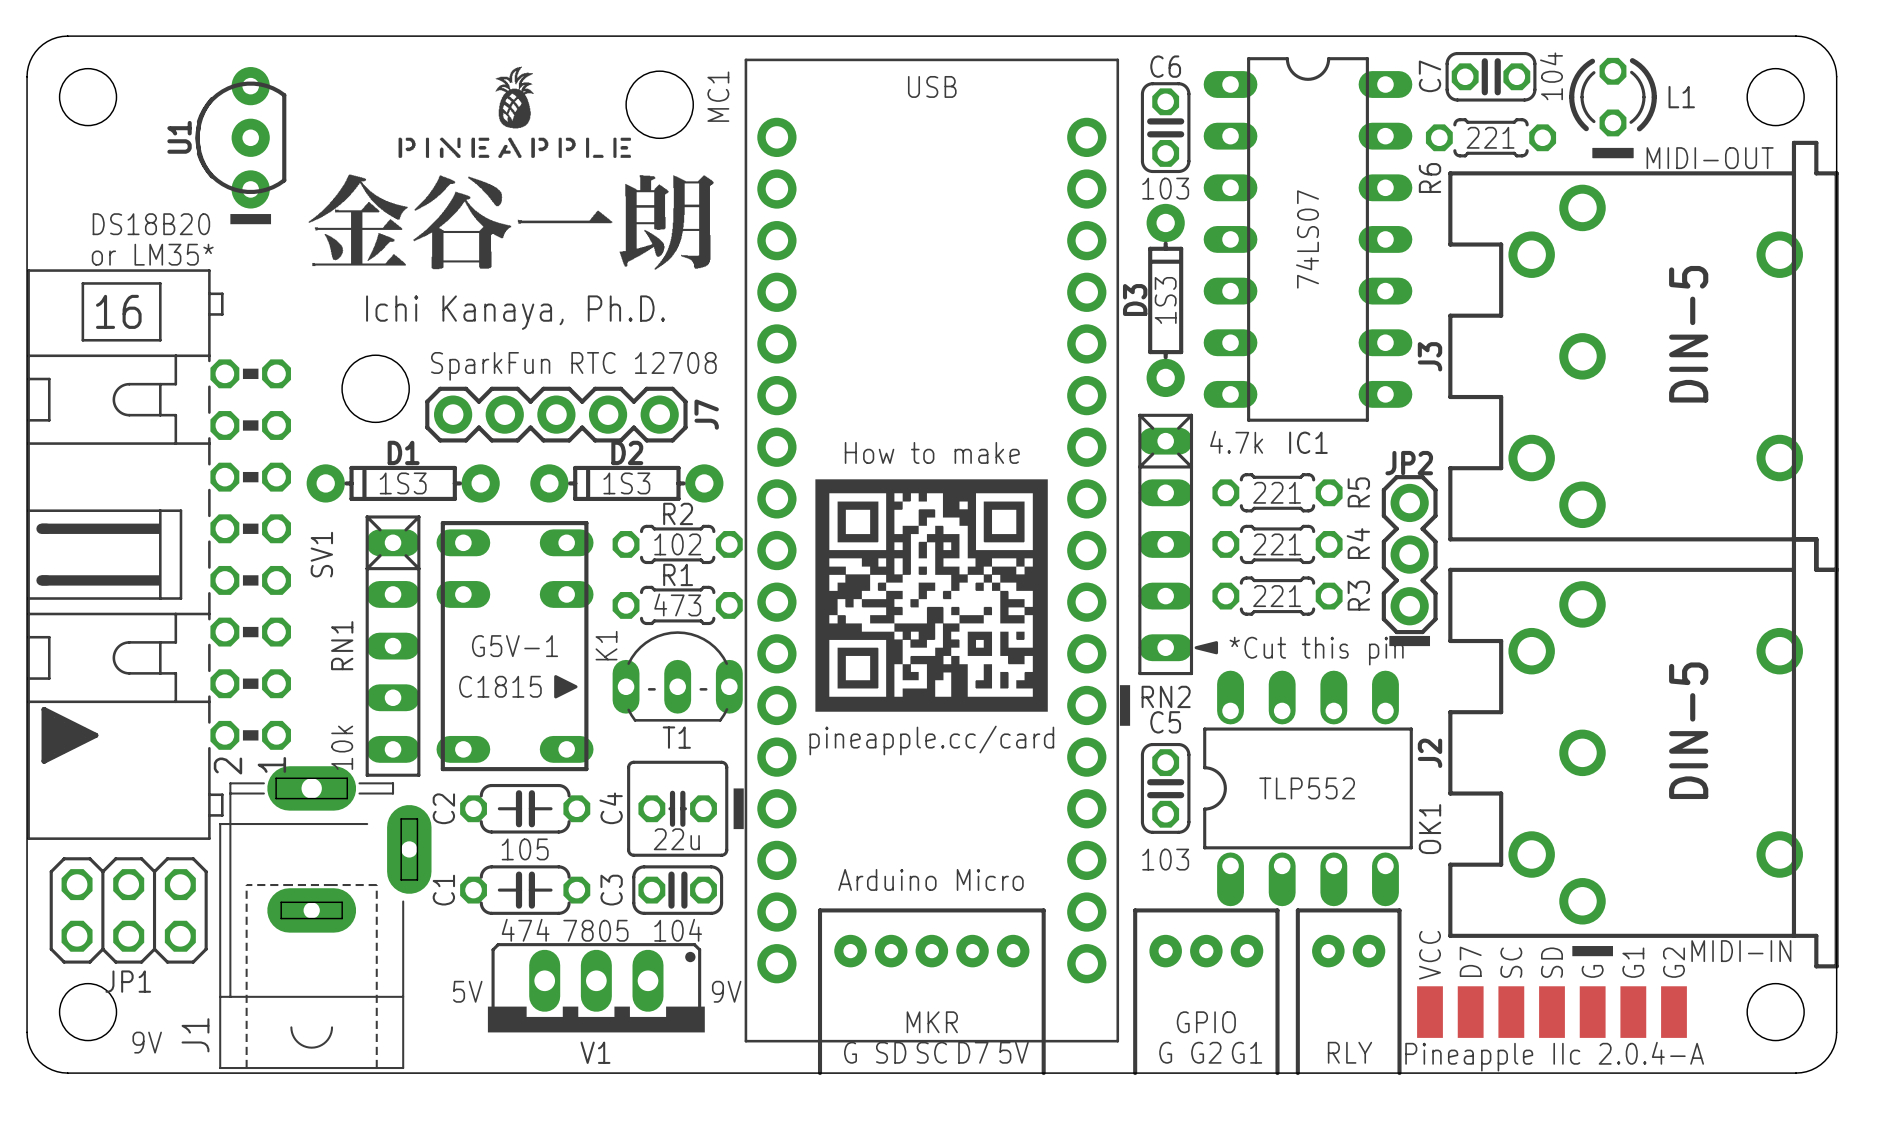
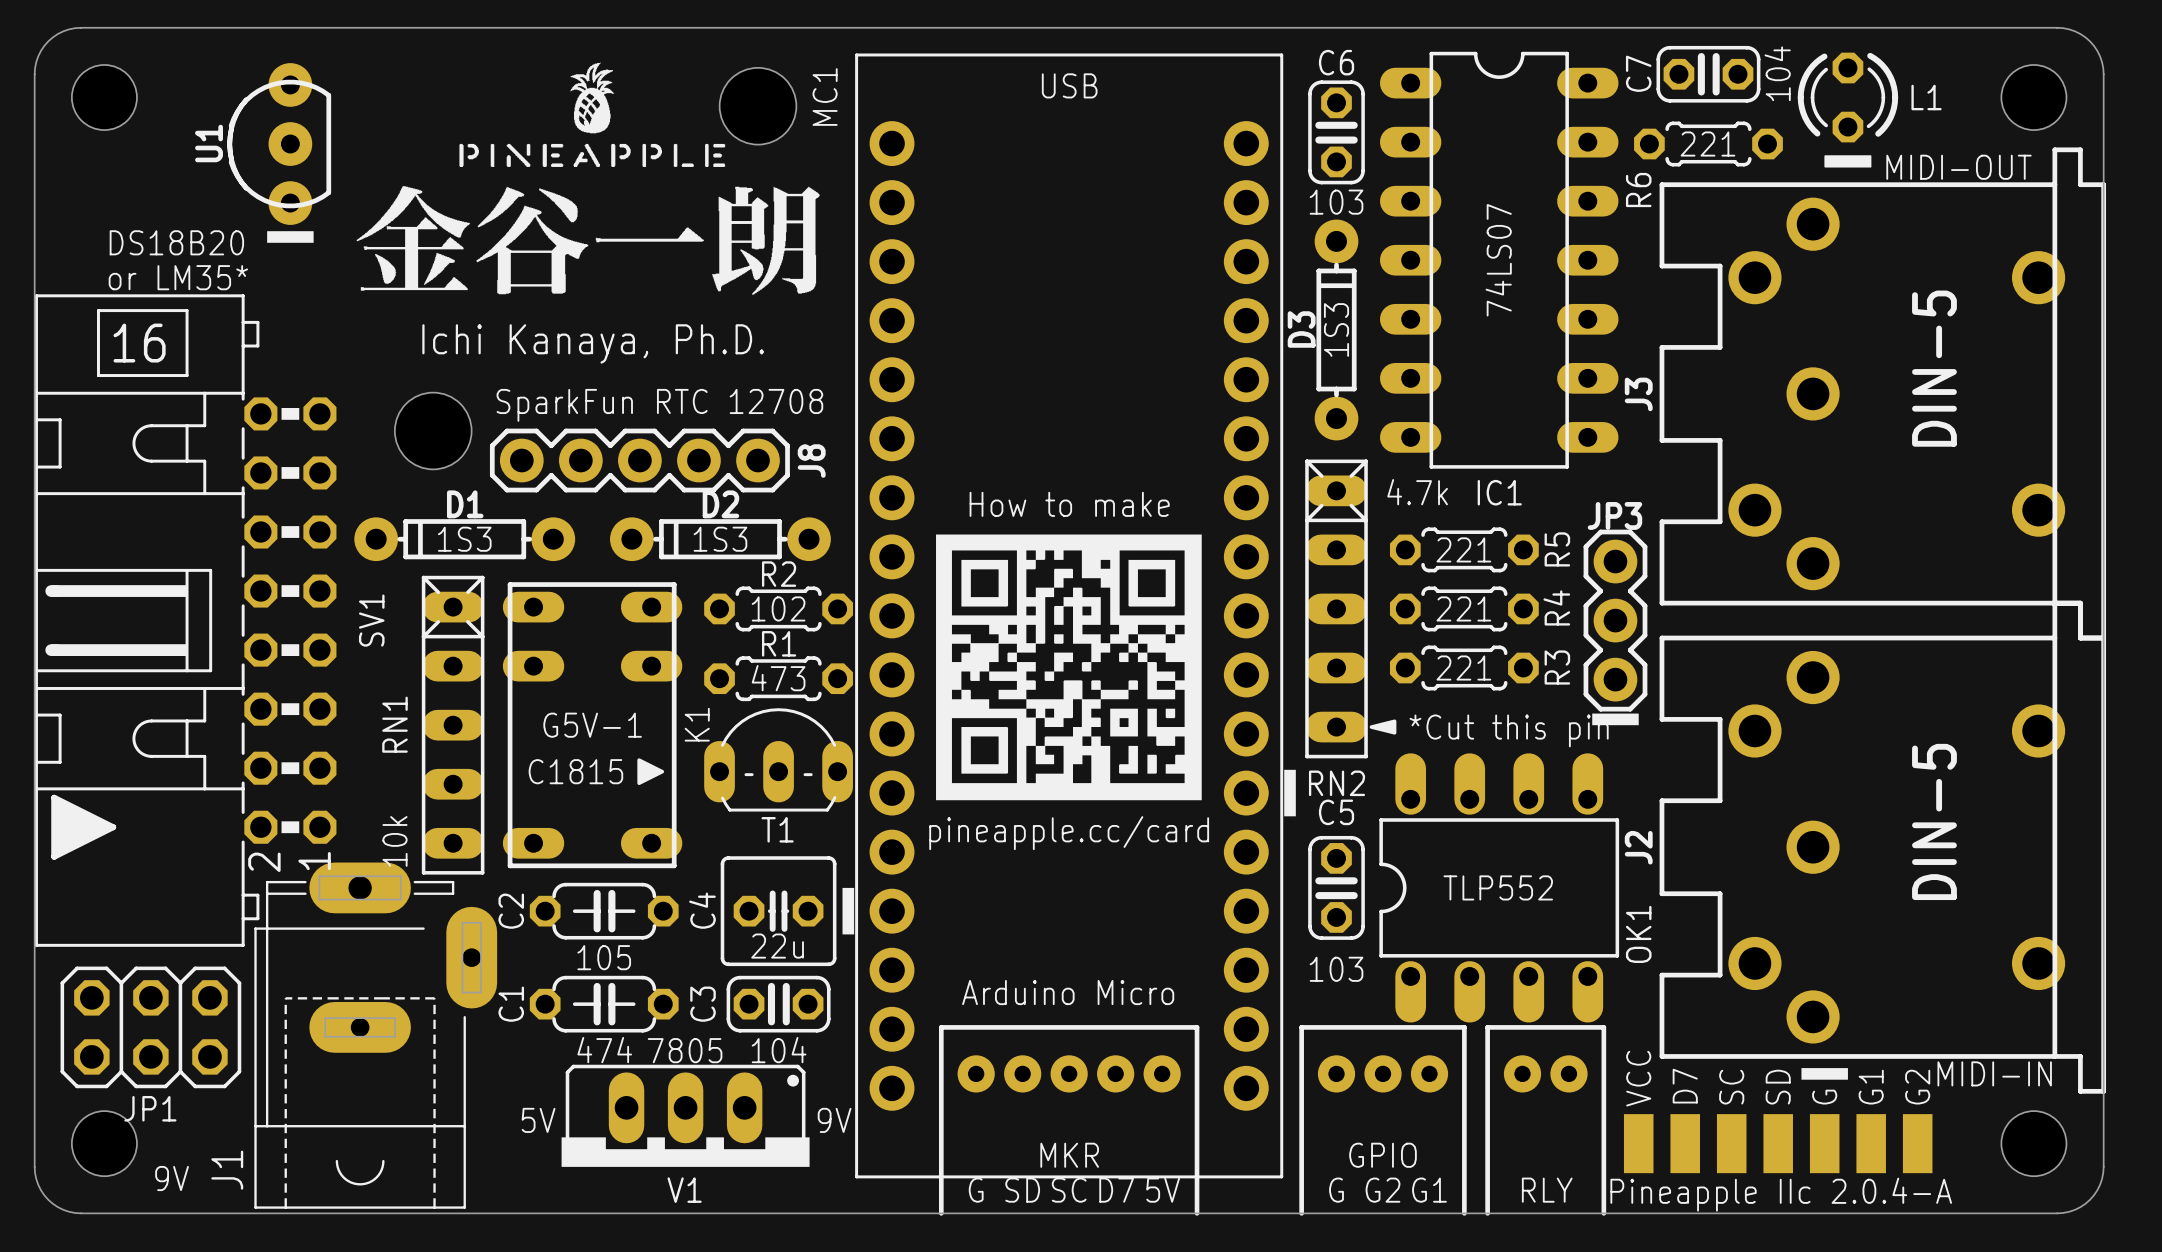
J7 name: J7 (706, 414) -> J8 (811, 461)
JP2 name: JP2 (1409, 463) -> JP3 (1614, 515)

